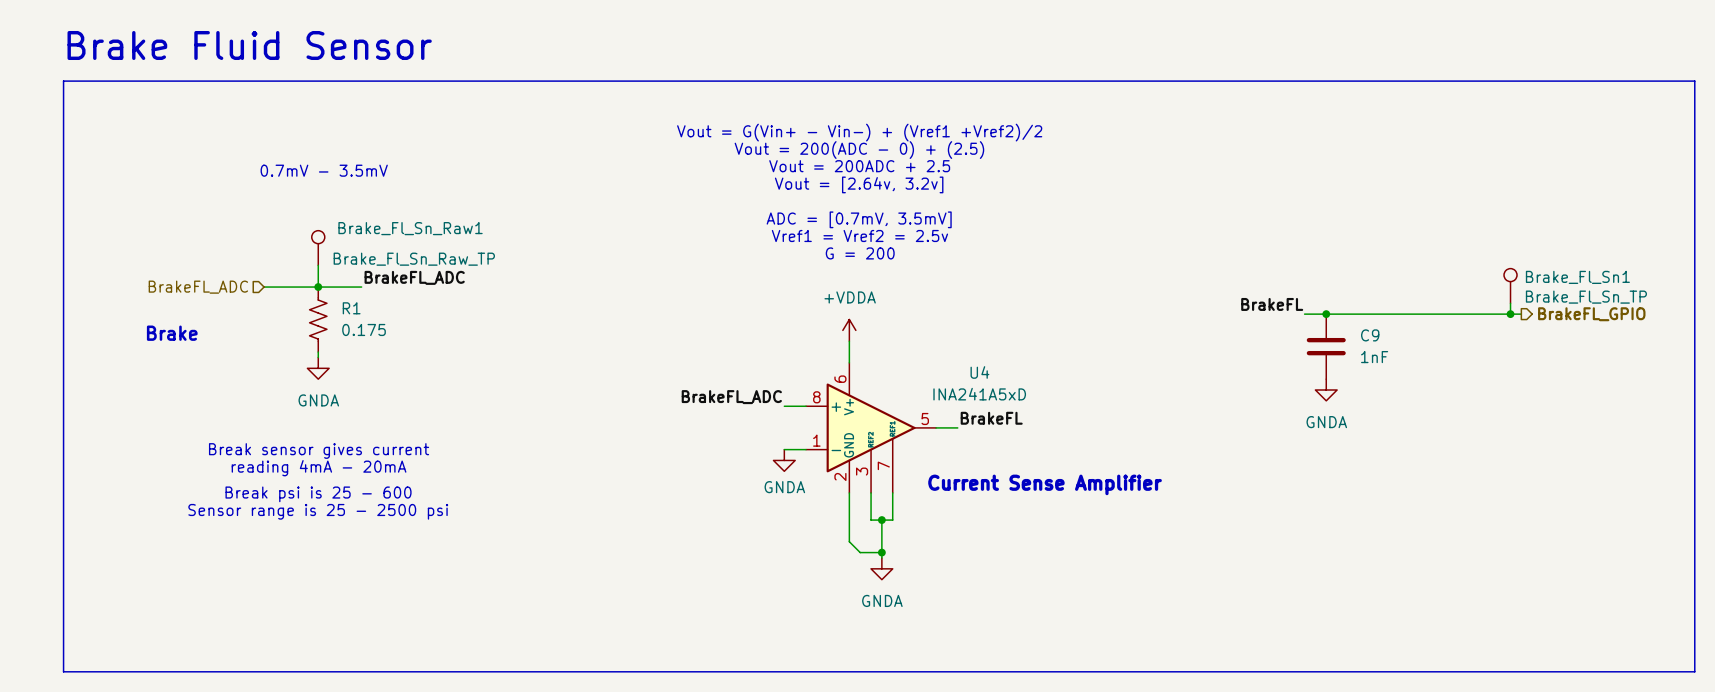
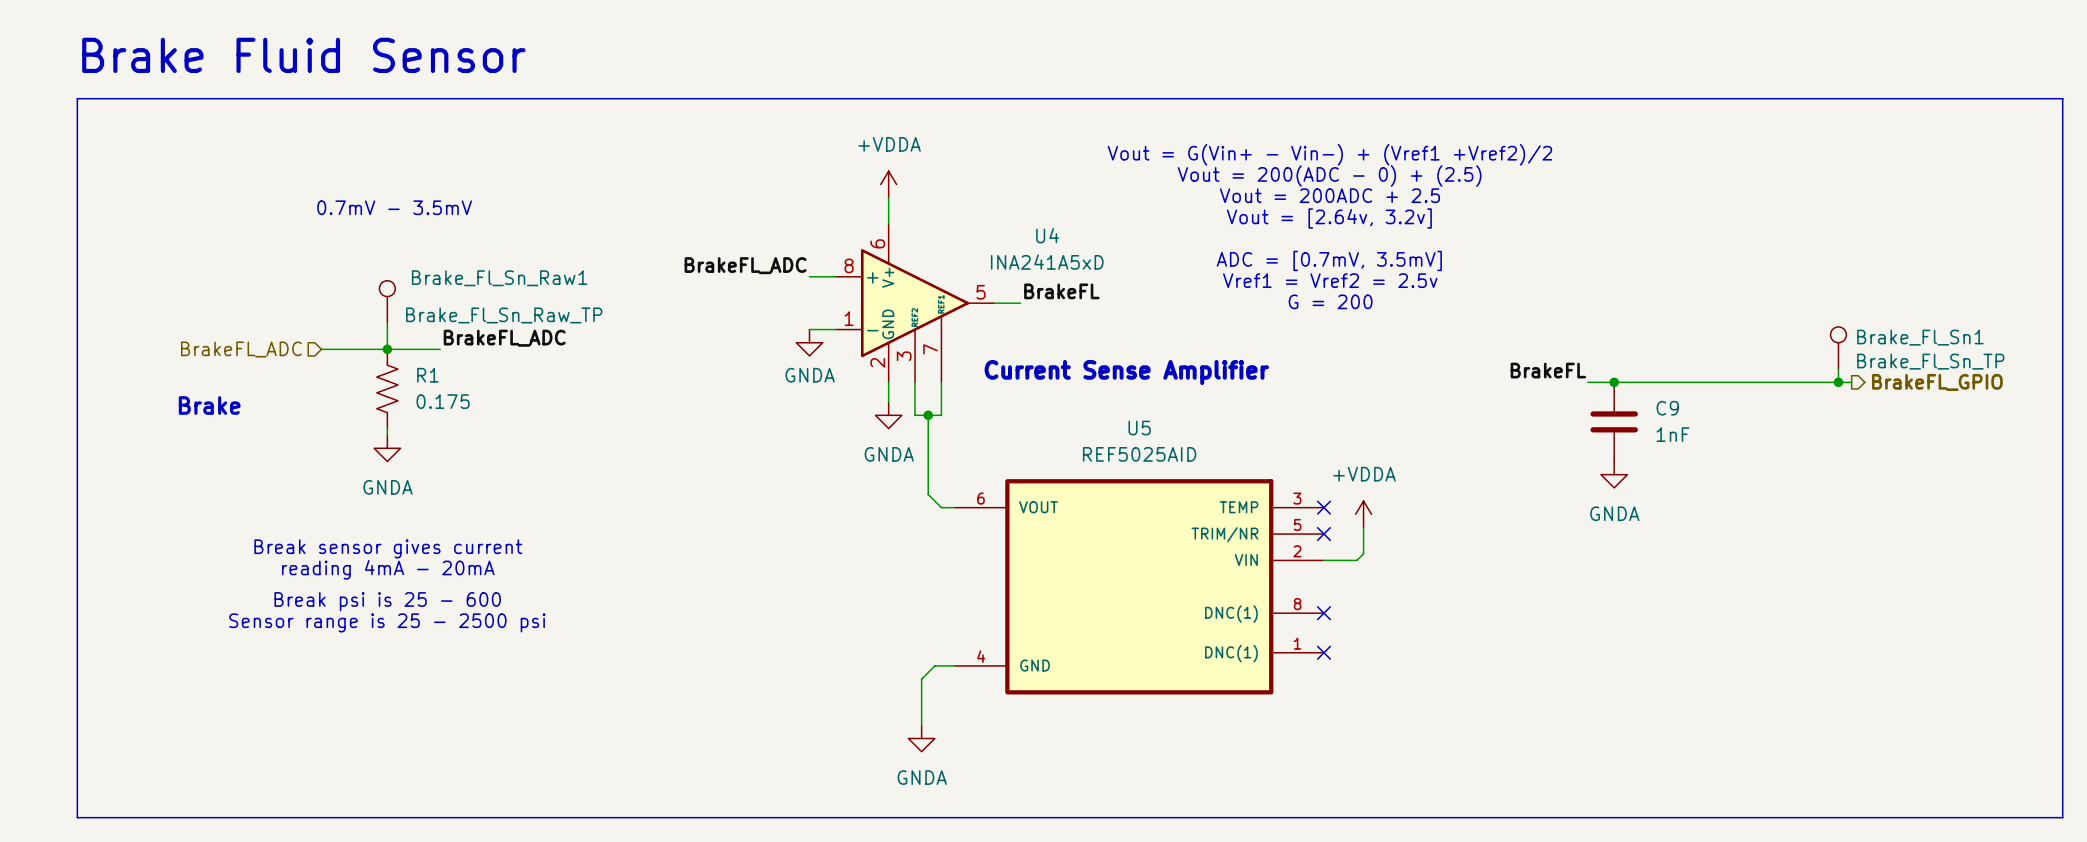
text: none -> Vout = G(Vin+ - Vin-) + (Vref1 +Vref2)/2 (1329, 154)
text: Vout = G(Vin+ - Vin-) + (Vref1 +Vref2)/2 (859, 132) -> none
text: none -> Vout = 200(ADC - 0) + (2.5) (1329, 176)
text: Vout = 200(ADC - 0) + (2.5) (859, 150) -> none
power symbol: none -> +VDDA (888, 184)
text: none -> Vout = 200ADC + 2.5 (1329, 195)
wire: none -> (888, 197) (888, 224)
text: Vout = 200ADC + 2.5 (859, 166) -> none
text: none -> Vout = [2.64v, 3.2v] (1329, 218)
text: Vout = [2.64v, 3.2v] (859, 184) -> none
text: none -> ADC = [0.7mV, 3.5mV] (1329, 260)
label: none -> BrakeFL_ADC (745, 265)
text: ADC = [0.7mV, 3.5mV] (859, 219) -> none
wire: none -> (809, 276) (835, 276)
text: none -> Vref1 = Vref2 = 2.5v (1330, 280)
text: Vref1 = Vref2 = 2.5v (859, 235) -> none
label: none -> BrakeFL (1061, 291)
text: none -> G = 200 (1330, 301)
text: G = 200 (860, 253) -> none
wire: none -> (809, 329) (835, 329)
power symbol: none -> GNDA (809, 342)
text: none -> Current Sense Amplifier (1126, 372)
wire: none -> (888, 382) (888, 402)
wire: none -> (915, 382) (915, 415) (941, 415) (941, 382)
power symbol: +VDDA (849, 330) -> none
power symbol: none -> GNDA (888, 415)
wire: none -> (928, 415) (928, 494) (941, 507) (954, 507)
junction: none -> (928, 415)
wire: (849, 341) (849, 362) -> none
label: BrakeFL_ADC (731, 397) -> none
wire: (784, 406) (806, 406) -> (994, 303) (1020, 303)
no-connect mark: none -> (1323, 507)
label: BrakeFL (991, 418) -> none
power symbol: none -> +VDDA (1363, 514)
U4 position: (871, 427) -> (915, 303)
wire: none -> (1363, 527) (1363, 553) (1356, 560) (1323, 560)
no-connect mark: none -> (1323, 534)
wire: (784, 449) (806, 449) -> none
power symbol: GNDA (784, 460) -> none
U5: none -> REF5025AID (1139, 586)
text: Current Sense Amplifier (1045, 484) -> none
no-connect mark: none -> (1323, 613)
junction: (881, 520) -> none
no-connect mark: none -> (1323, 652)
wire: none -> (954, 665) (934, 665) (921, 679) (921, 725)
junction: (881, 552) -> none
power symbol: GNDA (881, 568) -> none
power symbol: none -> GNDA (921, 738)

